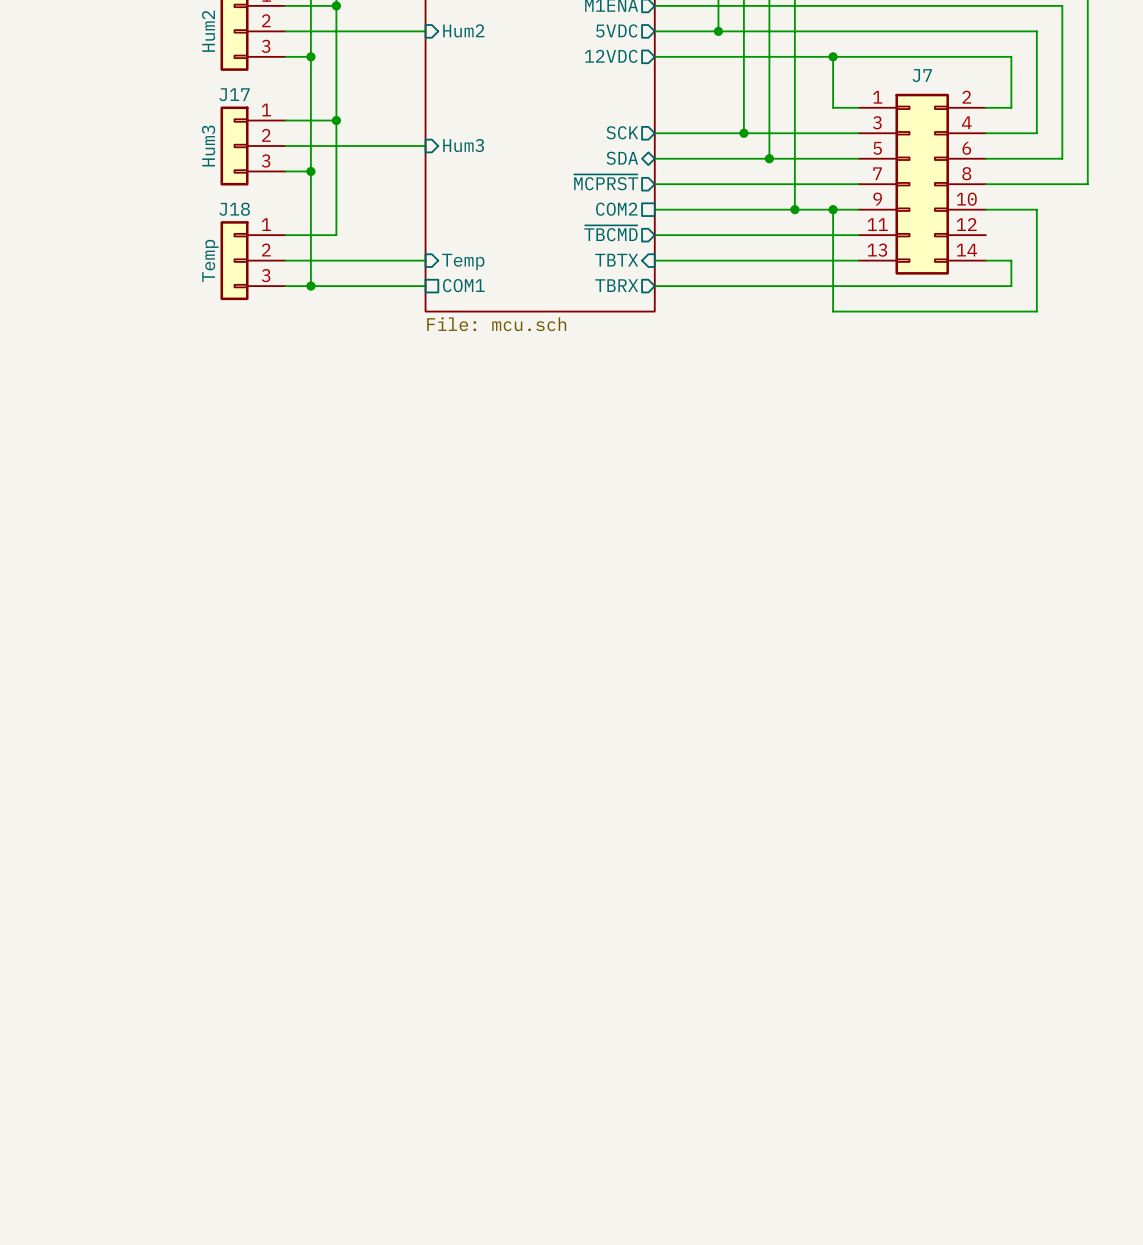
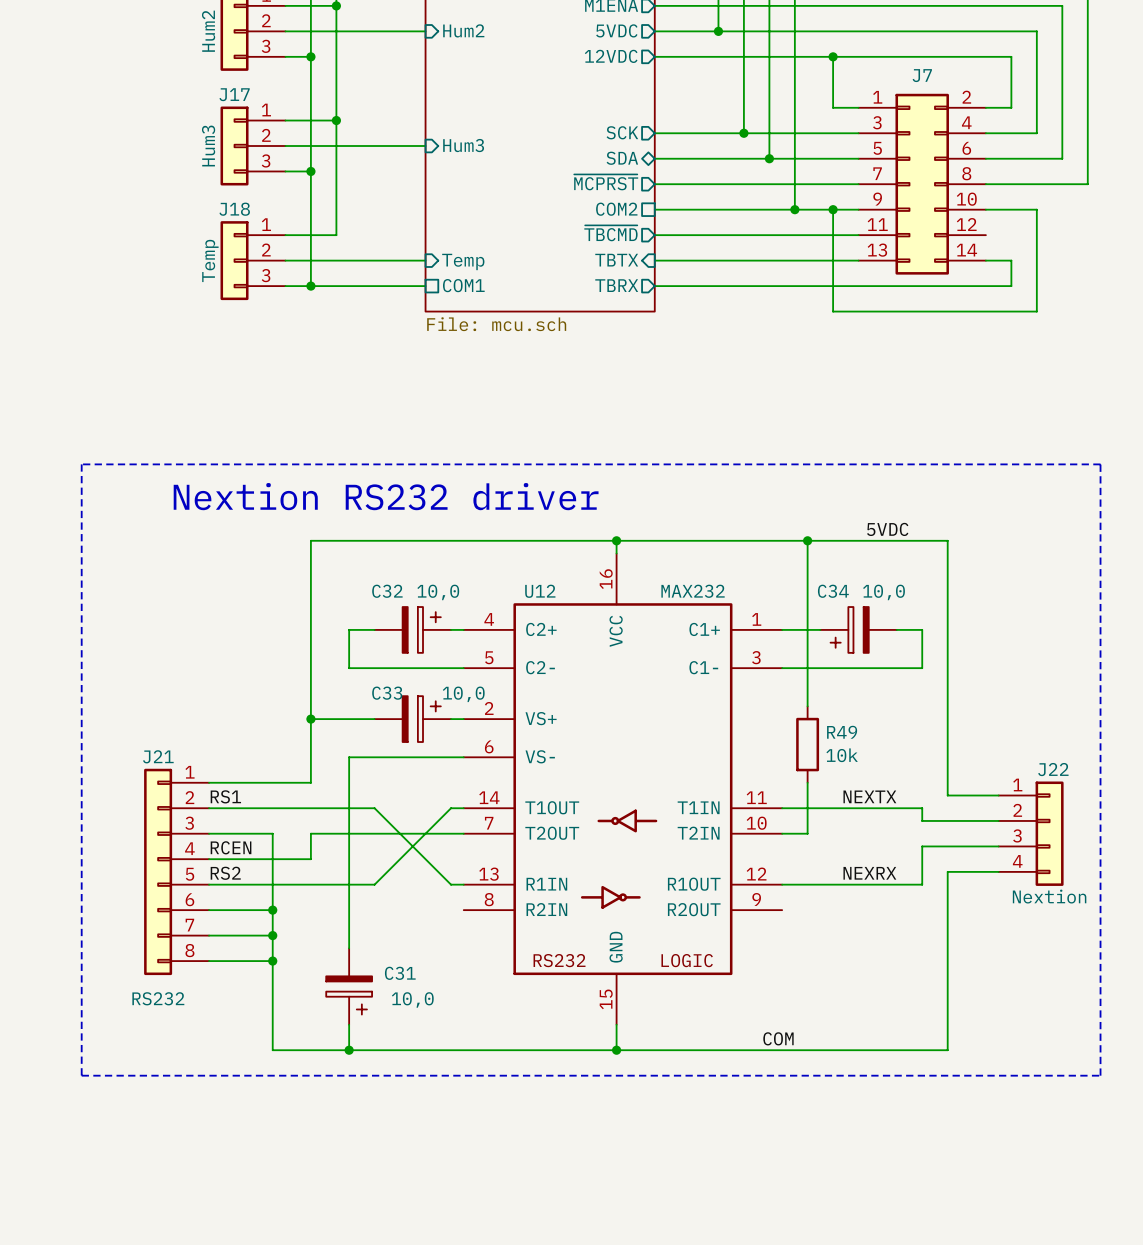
line: none -> (81, 464) (81, 1075) (1100, 1075) (1100, 464) (81, 464)
text: none -> Nextion RS232 driver (386, 496)
label: none -> 5VDC (887, 529)
wire: none -> (616, 540) (616, 553)
junction: none -> (616, 540)
wire: none -> (807, 540) (807, 706)
junction: none -> (807, 540)
wire: none -> (374, 629) (349, 629) (349, 668) (463, 668)
C32: none -> 10,0 (412, 629)
wire: none -> (451, 629) (463, 629)
wire: none -> (782, 629) (820, 629)
C34: none -> 10,0 (858, 629)
wire: none -> (896, 629) (922, 629) (922, 668) (782, 668)
wire: none -> (310, 719) (374, 719)
junction: none -> (310, 719)
C33: none -> 10,0 (412, 719)
wire: none -> (451, 719) (463, 719)
R49: none -> 10k (807, 744)
wire: none -> (463, 757) (349, 757) (349, 948)
wire: none -> (209, 782) (310, 782) (310, 540) (947, 540) (947, 795) (998, 795)
wire: none -> (807, 782) (807, 833) (782, 833)
U12: none -> MAX232 (622, 789)
label: none -> RS1 (225, 796)
label: none -> NEXTX (869, 796)
wire: none -> (209, 808) (374, 808) (451, 884) (463, 884)
wire: none -> (463, 808) (451, 808) (374, 884) (209, 884)
wire: none -> (782, 808) (922, 808) (922, 820) (998, 820)
wire: none -> (209, 833) (272, 833) (272, 1050) (947, 1050) (947, 871) (998, 871)
wire: none -> (463, 833) (310, 833) (310, 859) (209, 859)
J22: none -> Nextion (1031, 833)
wire: none -> (998, 846) (922, 846) (922, 884) (782, 884)
label: none -> RCEN (231, 847)
J21: none -> RS232 (176, 871)
label: none -> RS2 (225, 873)
label: none -> NEXRX (869, 873)
wire: none -> (209, 910) (272, 910)
junction: none -> (272, 910)
wire: none -> (209, 935) (272, 935)
junction: none -> (272, 935)
wire: none -> (209, 961) (272, 961)
junction: none -> (272, 961)
C31: none -> 10,0 (349, 986)
wire: none -> (349, 1024) (349, 1050)
wire: none -> (616, 1024) (616, 1050)
label: none -> COM (778, 1038)
junction: none -> (349, 1050)
junction: none -> (616, 1050)

